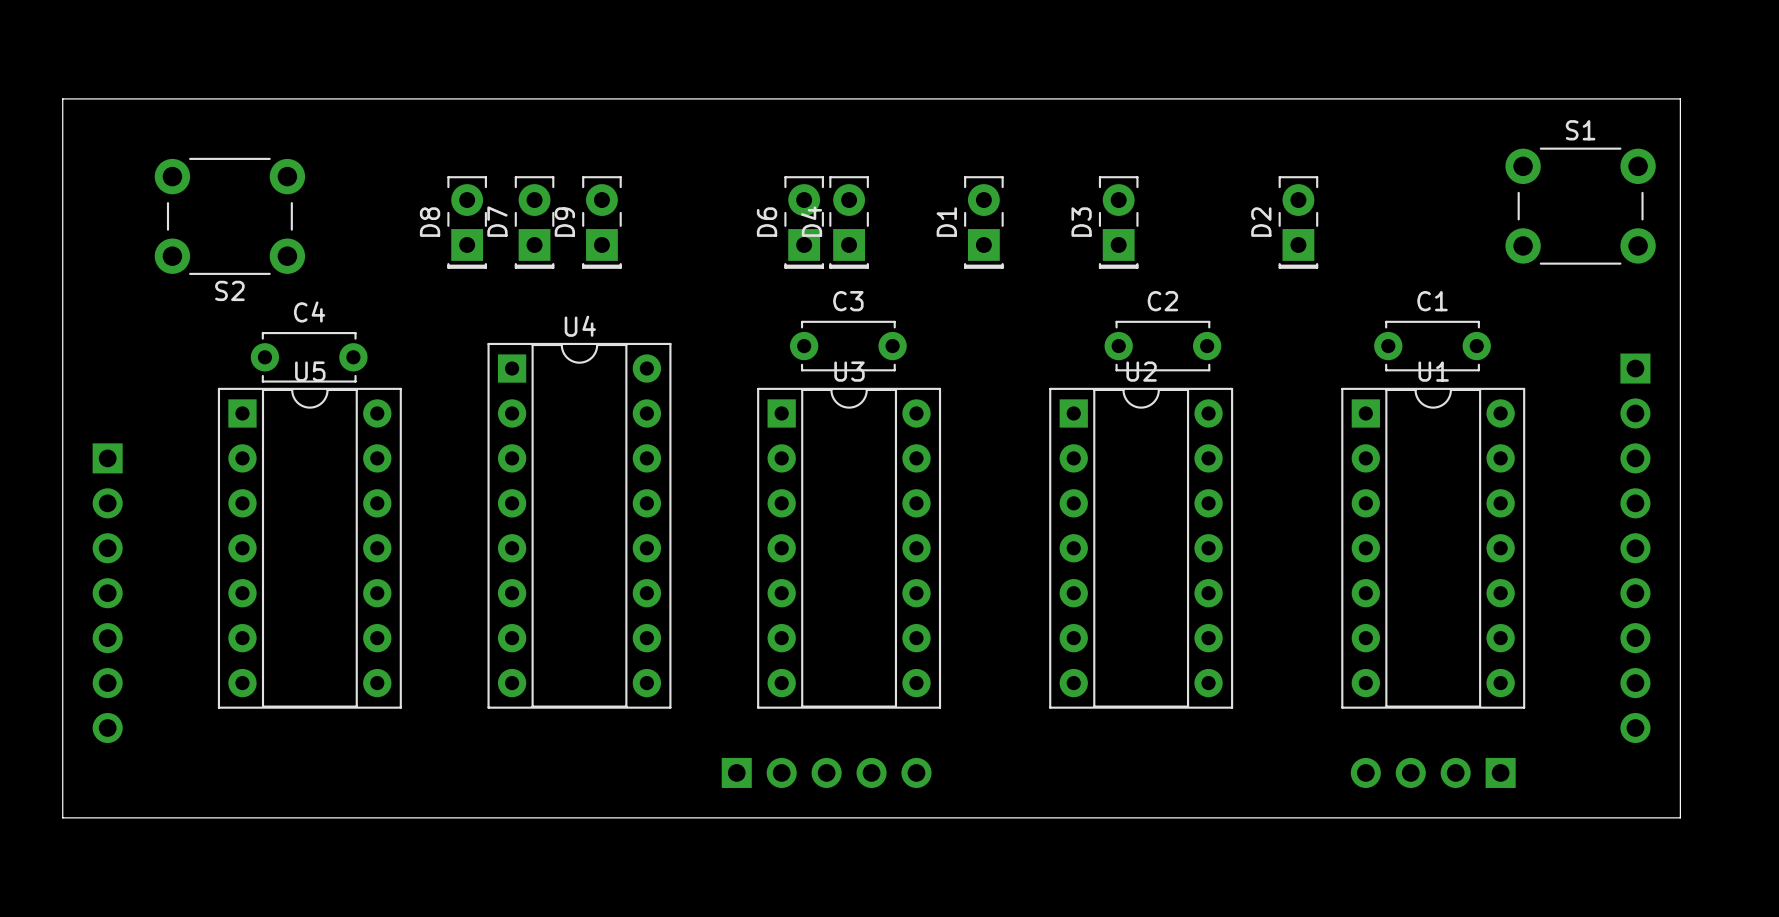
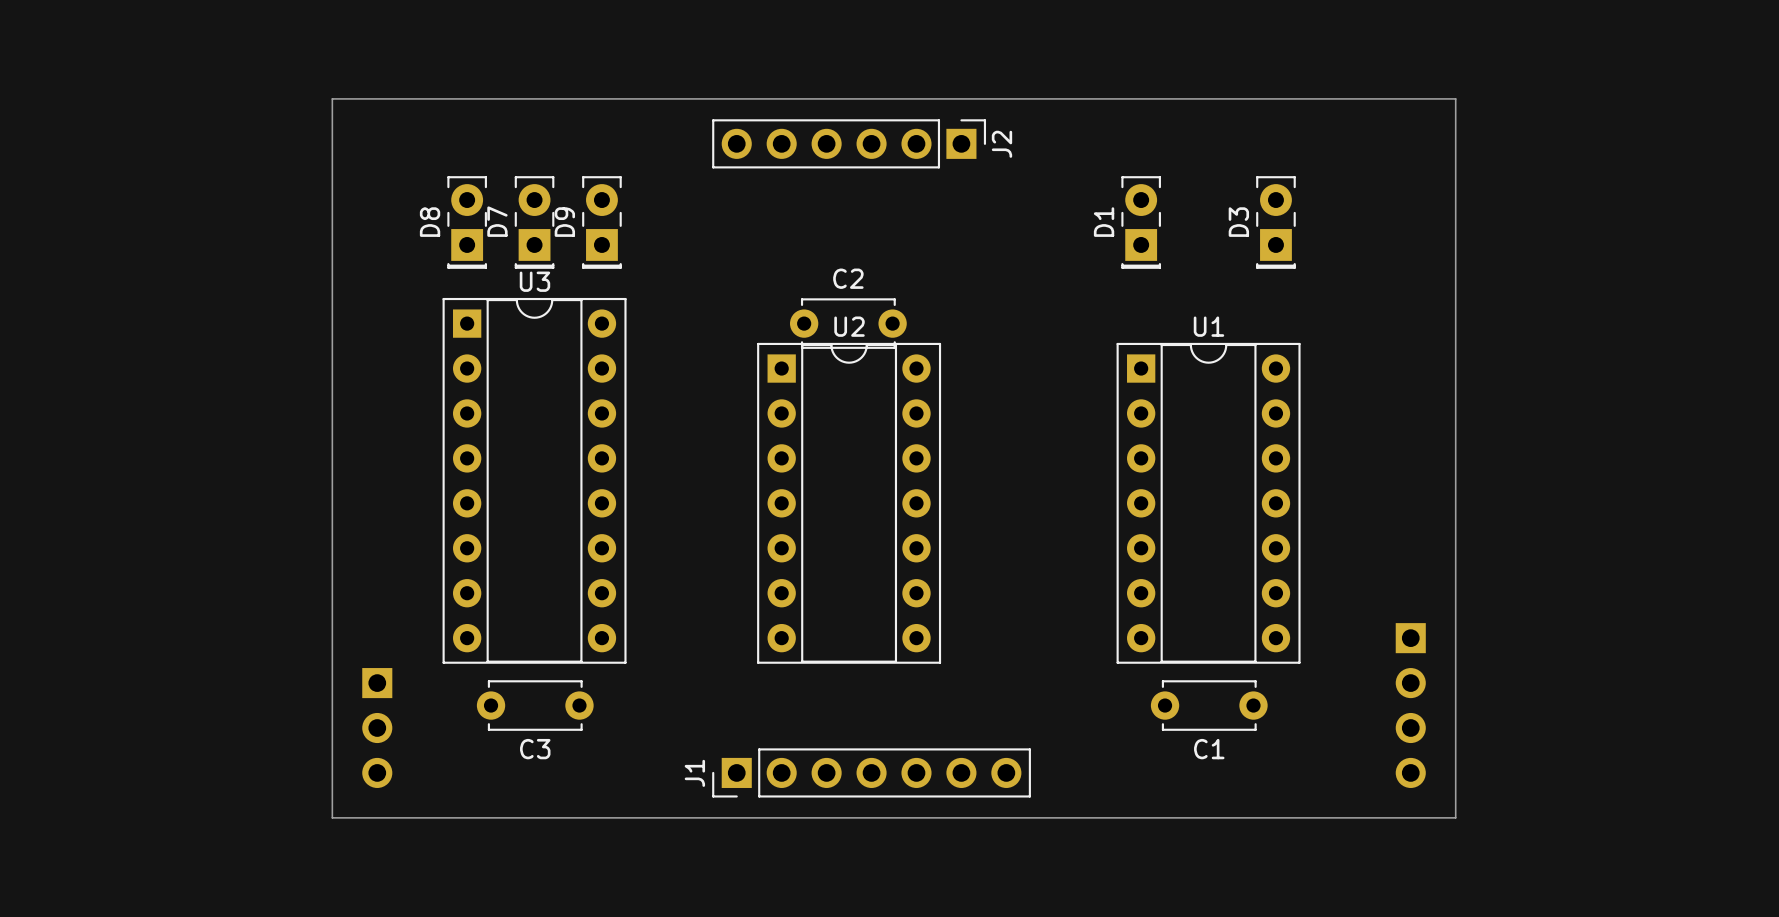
board edge: (332, 98) (62, 98) (62, 817) (332, 817) -> (332, 98) (332, 817)
board edge: (1455, 98) (1680, 98) (1680, 817) (1455, 817) -> (1455, 98) (1455, 817)
J2: none -> (849, 143)
S1: (1580, 206) -> none
S2: (229, 216) -> none
D6: (804, 222) -> none
D4: (849, 222) -> none
D1 position: (983, 222) -> (1141, 222)
D3 position: (1118, 222) -> (1275, 222)
D2: (1298, 222) -> none
C3 name position: C3 (848, 301) -> C3 (535, 749)
C1 name position: C1 (1432, 301) -> C1 (1209, 749)
C3 position: (848, 346) -> (535, 705)
C2 position: (1162, 346) -> (848, 323)
C1 position: (1432, 346) -> (1209, 705)
C4: (309, 357) -> none
U3 footprint: [757, 387, 942, 709] -> [442, 297, 627, 664]
U4: (579, 525) -> none
U5: (309, 548) -> none
U2 position: (1141, 548) -> (849, 503)
U1 position: (1433, 548) -> (1208, 503)
part: (1635, 548) -> none
part: (107, 593) -> none
part: none -> (377, 728)
J1: none -> (871, 772)
part rotation: 0° (1433, 772) -> 90° counterclockwise (1410, 705)

